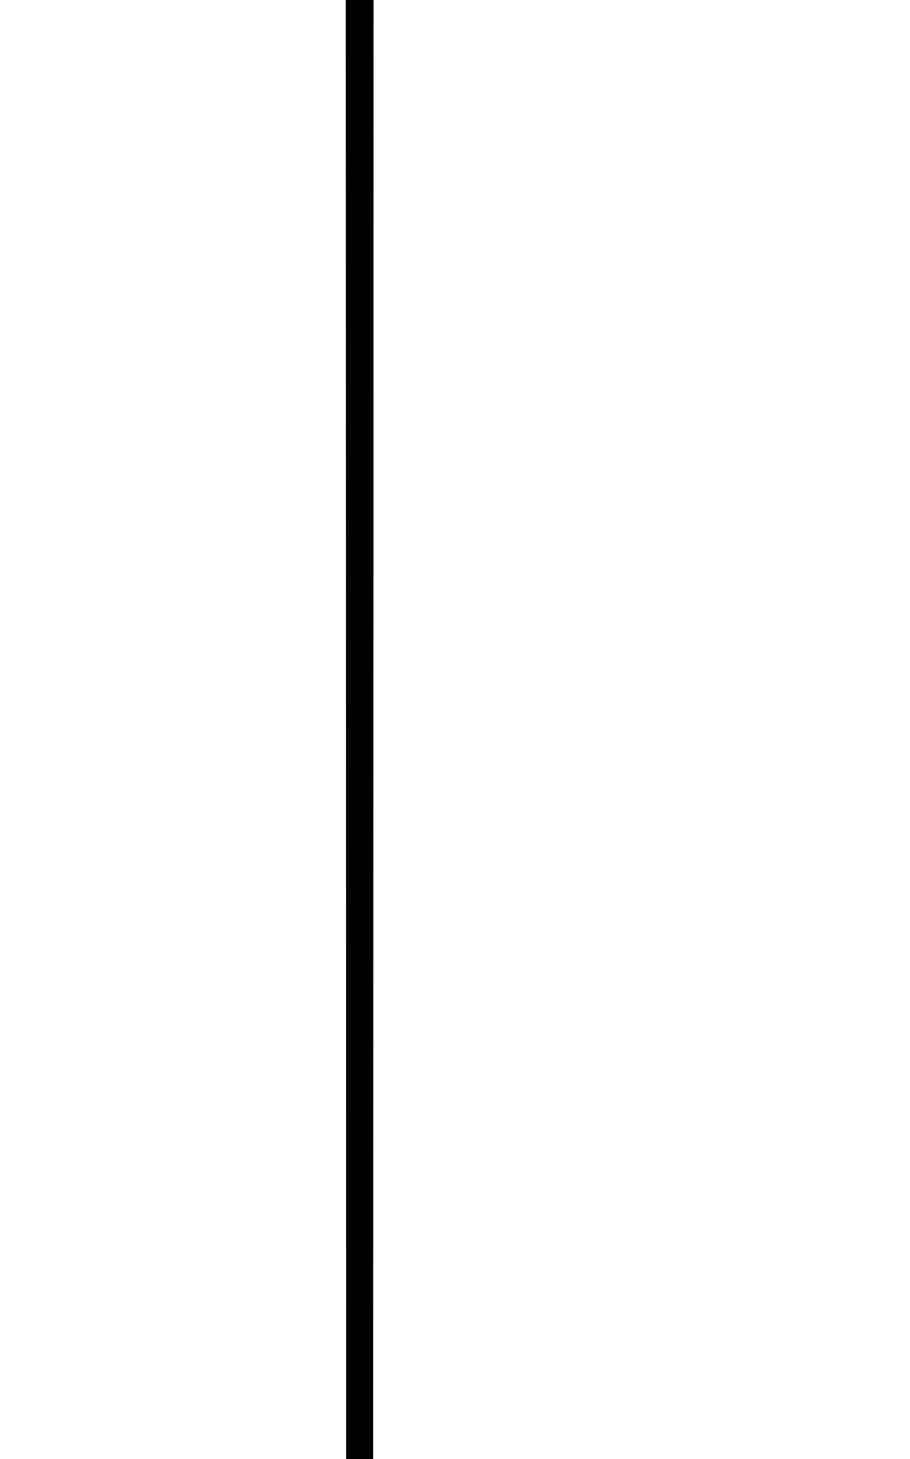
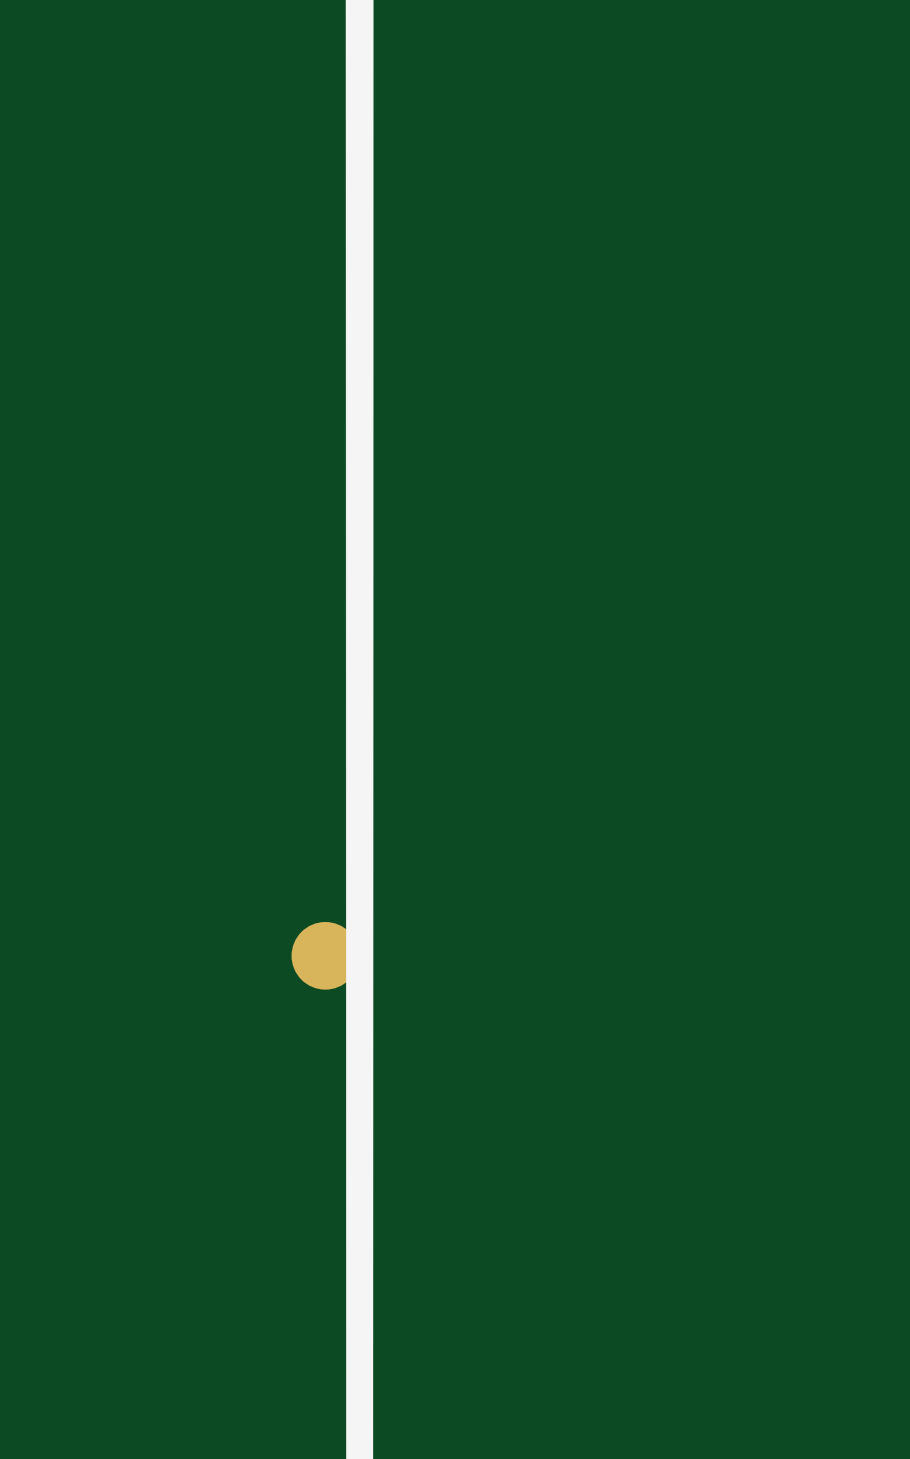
part: none -> (325, 955)

